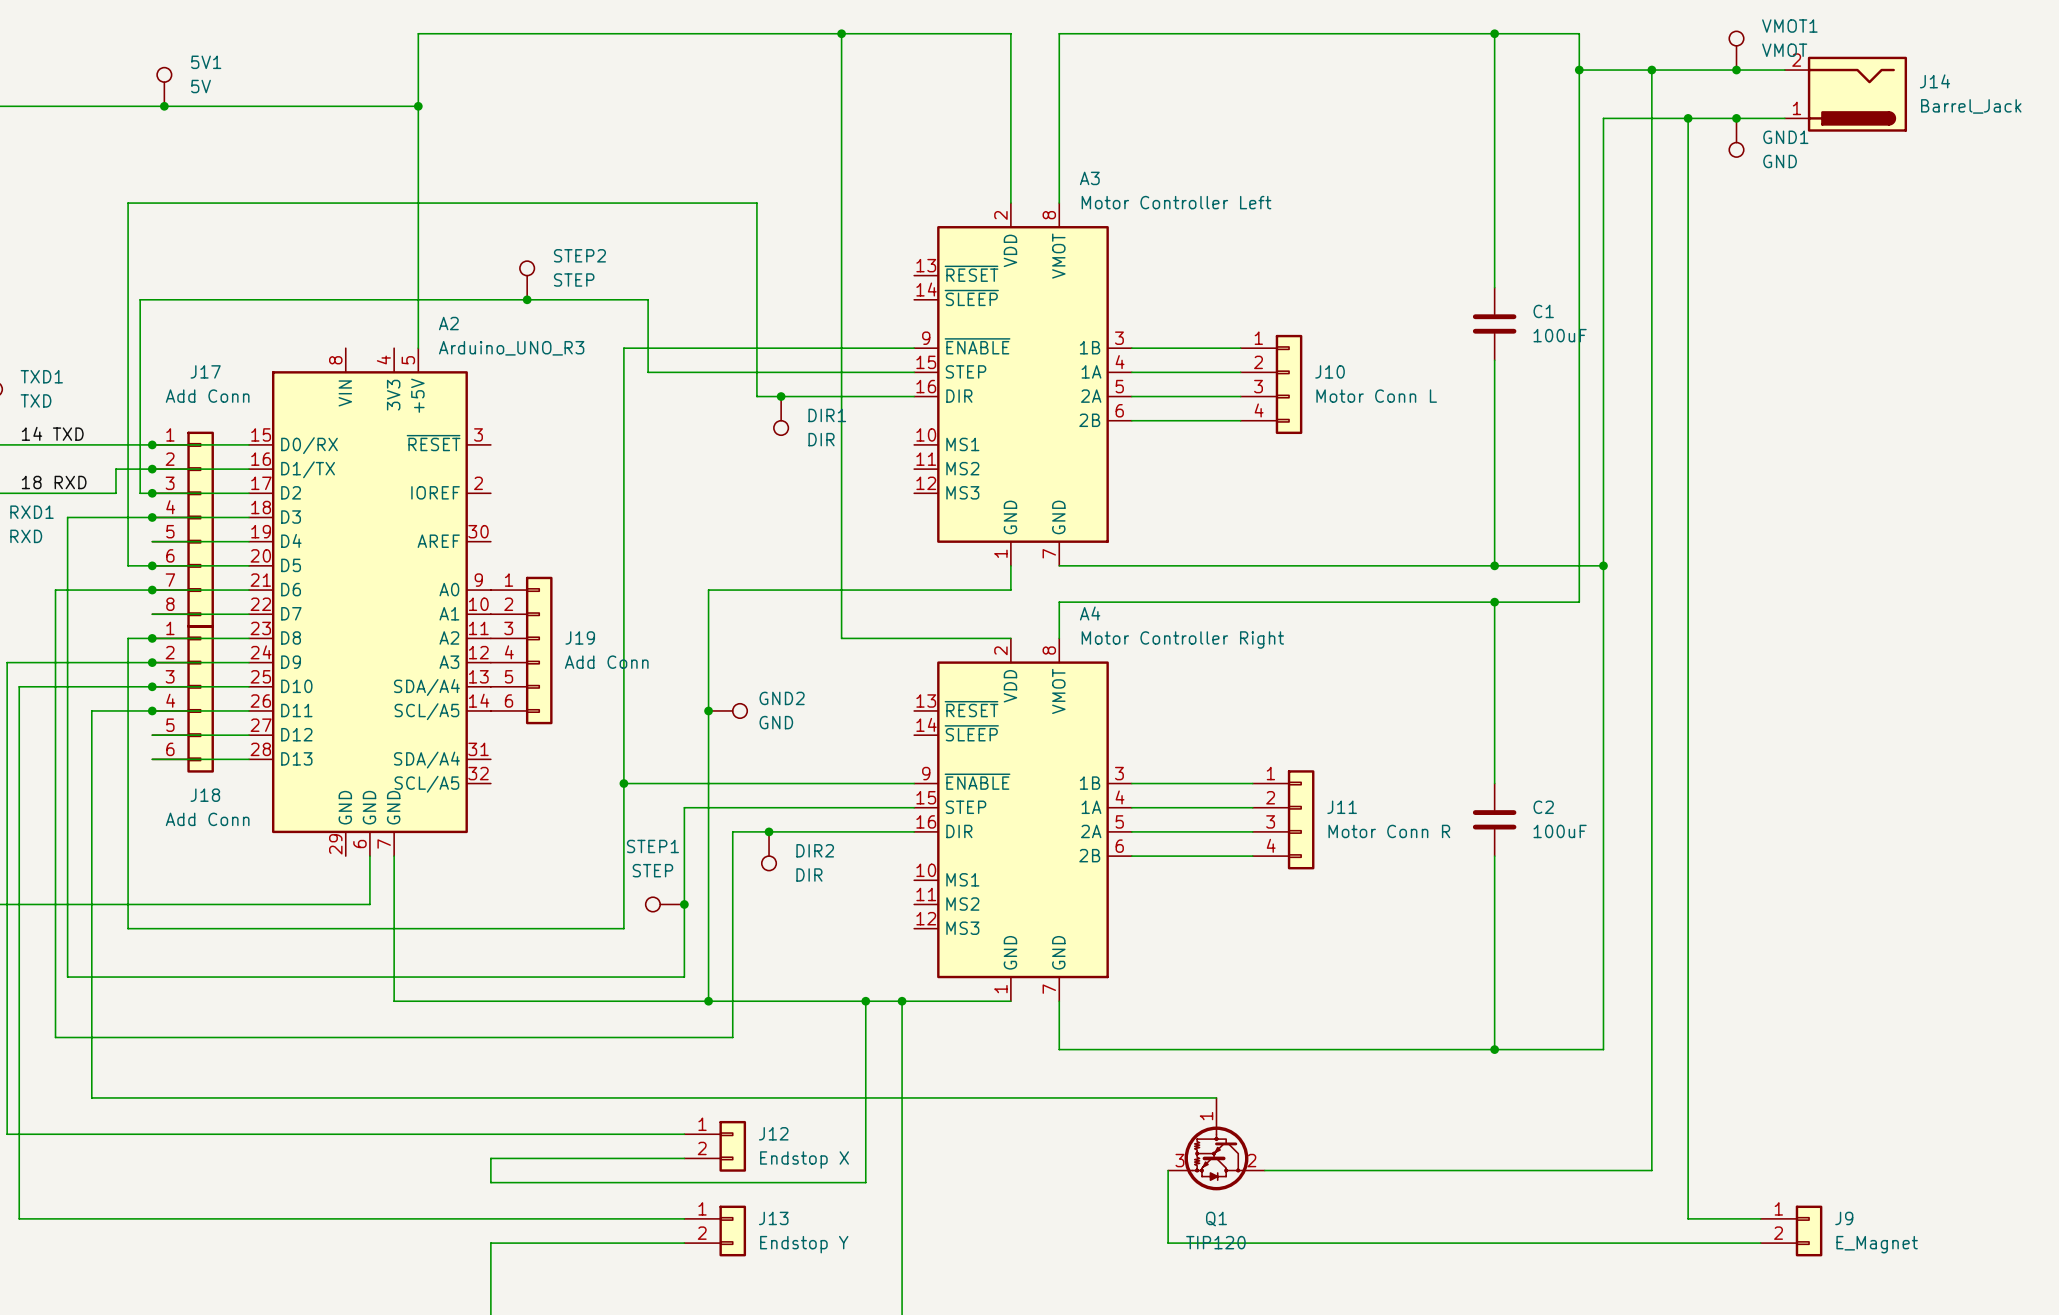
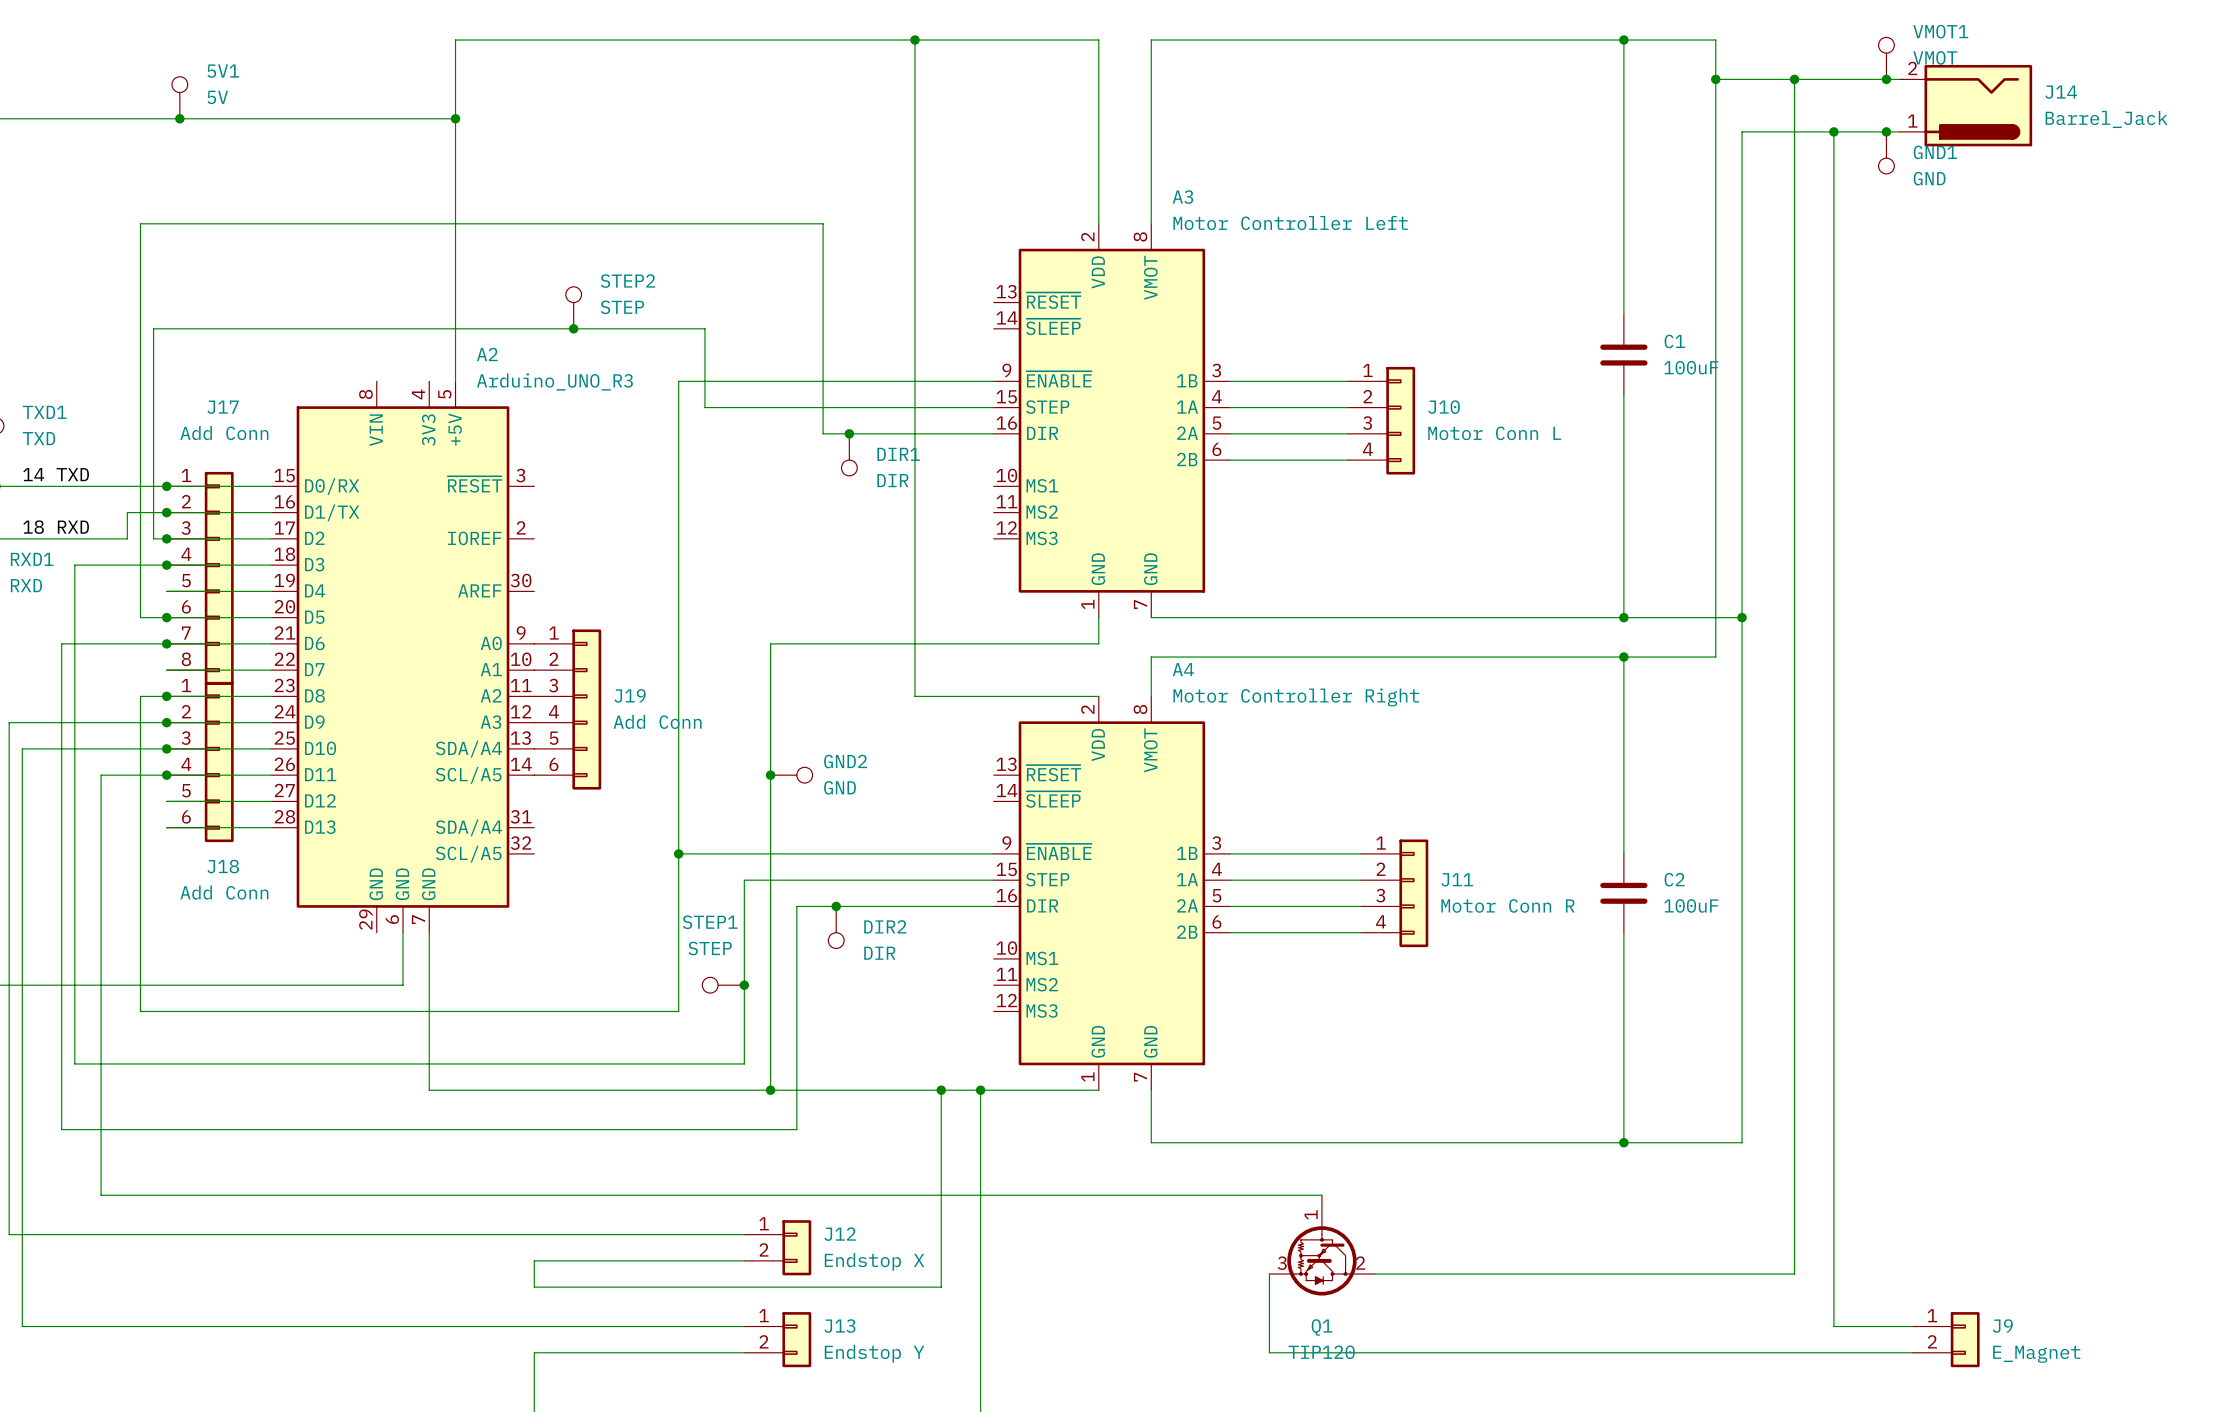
J14 position: (1845, 94) -> (1965, 105)

